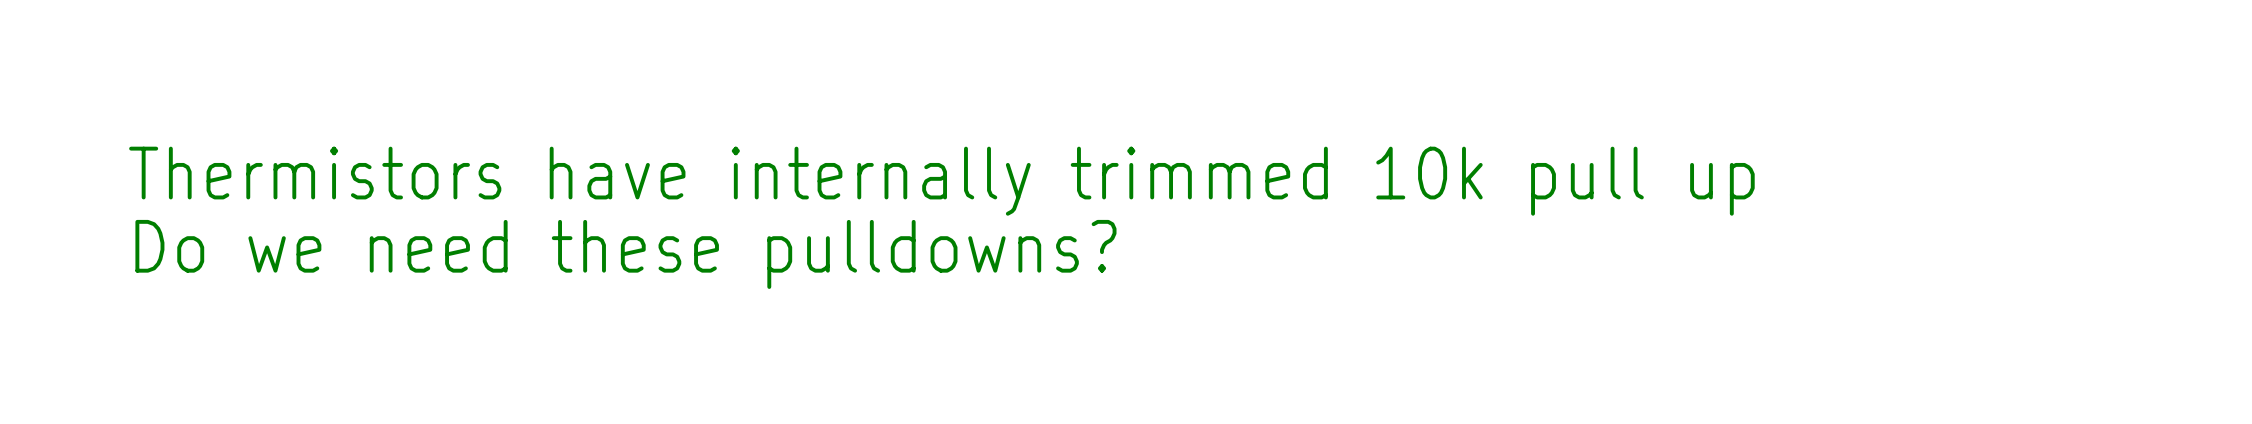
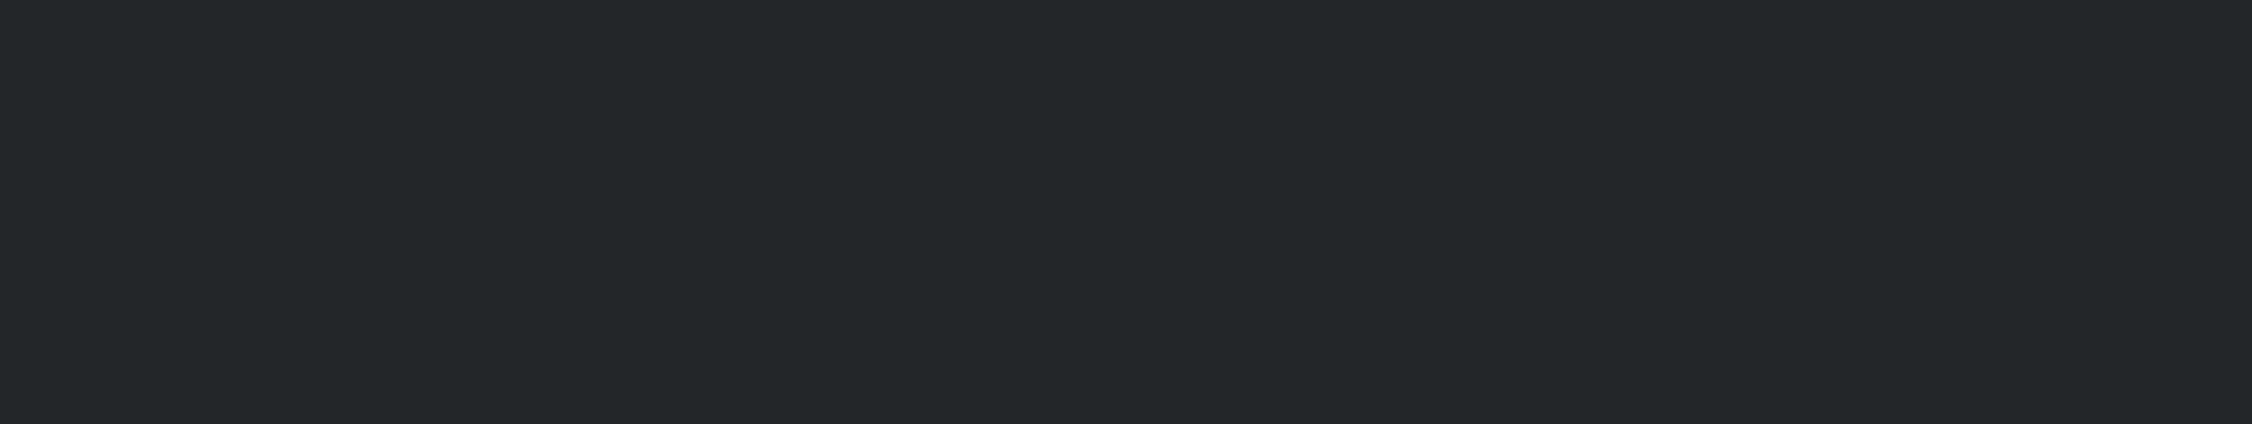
text: Thermistors have internally trimmed 10k pull up (941, 181) -> none
text: Do we need these pulldowns? (625, 254) -> none

